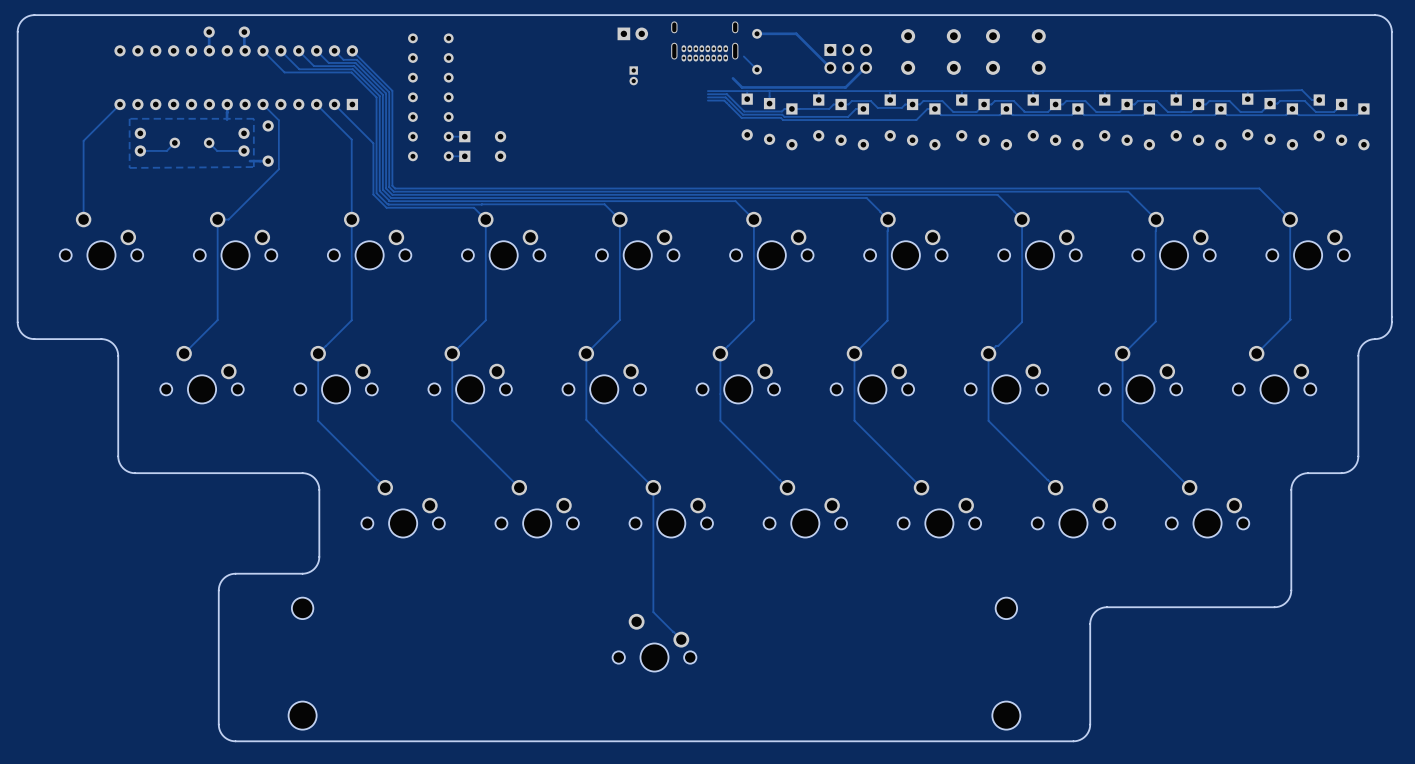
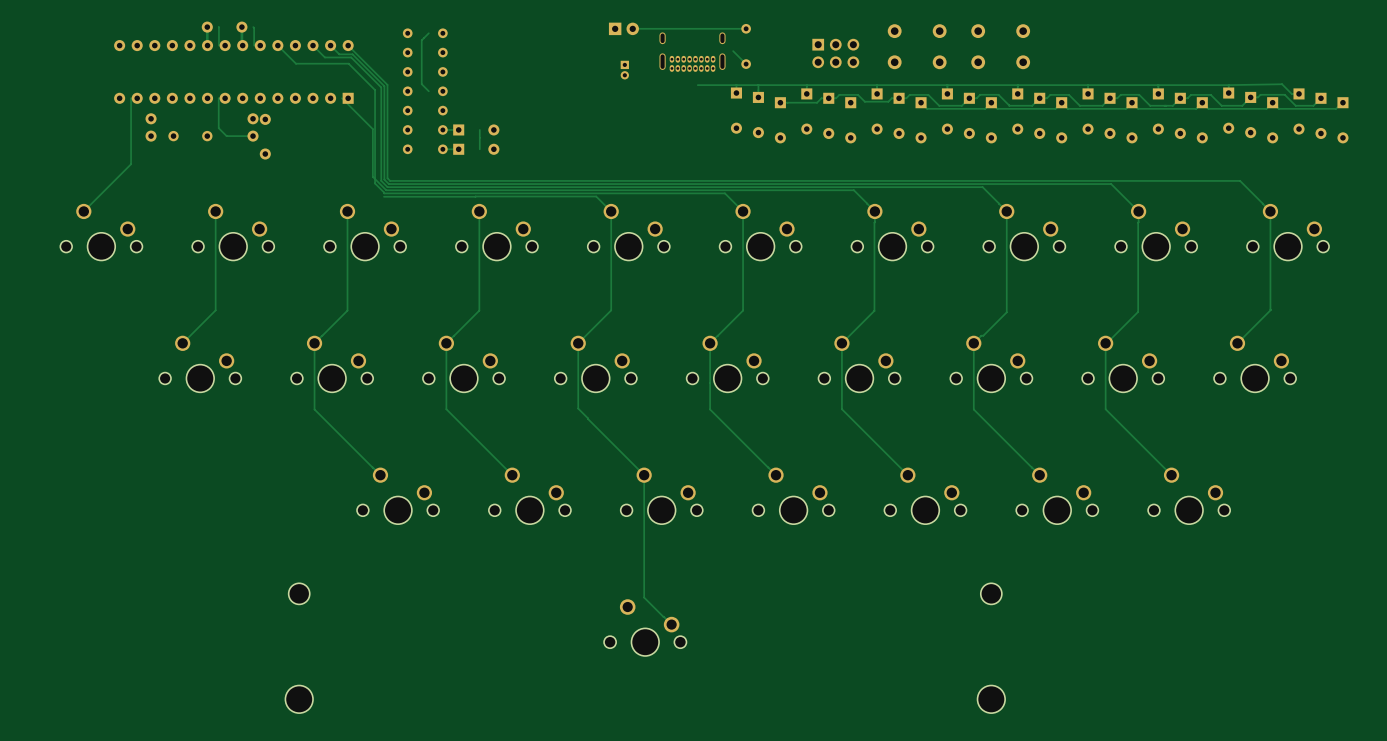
board edge: (1375, 15) (30, 15) (21, 21) (17, 31) (18, 326) (24, 335) (32, 338) (103, 339) (114, 345) (118, 355) (118, 458) (121, 466) (126, 470) (134, 473) (302, 473) (310, 475) (317, 481) (319, 489) (319, 556) (314, 568) (302, 573) (233, 573) (225, 577) (220, 584) (218, 724) (222, 734) (229, 740) (1077, 740) (1086, 734) (1090, 726) (1090, 623) (1095, 612) (1106, 607) (1274, 607) (1282, 604) (1289, 598) (1291, 592) (1291, 489) (1293, 481) (1299, 475) (1305, 473) (1345, 472) (1351, 469) (1357, 462) (1358, 351) (1366, 341) (1381, 337) (1386, 334) (1391, 322) (1391, 31) (1386, 20) (1375, 15) -> none
track: none -> (218, 27) (218, 45)
track: none -> (253, 27) (254, 45)
track: (757, 33) (796, 33) (830, 67) -> (746, 28) (632, 28)
track: none -> (428, 33) (421, 40) (421, 84) (428, 91)
part position: (704, 41) -> (692, 52)
track: (263, 50) (284, 72) (351, 72) (376, 97) (376, 193) (388, 204) -> none
track: (298, 50) (314, 66) (354, 66) (382, 94) (382, 189) -> (342, 98) (372, 129) (372, 176) (378, 182)
track: (866, 67) (845, 87) (742, 87) (732, 78) -> none
track: (707, 94) (726, 94) (744, 111) (781, 111) (784, 108) (791, 108) -> none
track: (707, 97) (725, 97) (742, 114) (848, 116) (856, 108) (863, 108) -> none
track: (707, 100) (724, 100) (741, 117) (780, 117) (783, 120) (916, 120) (927, 108) (934, 108) -> none
track: (120, 104) (83, 140) (83, 219) -> (131, 98) (131, 164) (83, 211)
track: none -> (218, 98) (218, 128) (226, 136) (253, 136)
track: (227, 104) (227, 119) -> none
track: (263, 104) (278, 120) (278, 169) (228, 219) (217, 219) -> none
track: (316, 104) (351, 139) (351, 219) -> none
track: (334, 104) (373, 143) (373, 194) (386, 207) (473, 207) (485, 219) -> none
zone outline: (253, 118) (253, 167) (129, 167) (129, 118) (253, 118) -> none
track: none -> (479, 129) (479, 149)
part position: (140, 142) -> (151, 127)
track: (174, 142) (166, 150) (140, 150) -> none
track: (209, 142) (217, 150) (244, 150) -> none
part position: (244, 142) -> (253, 127)
track: (268, 161) (249, 161) -> none

